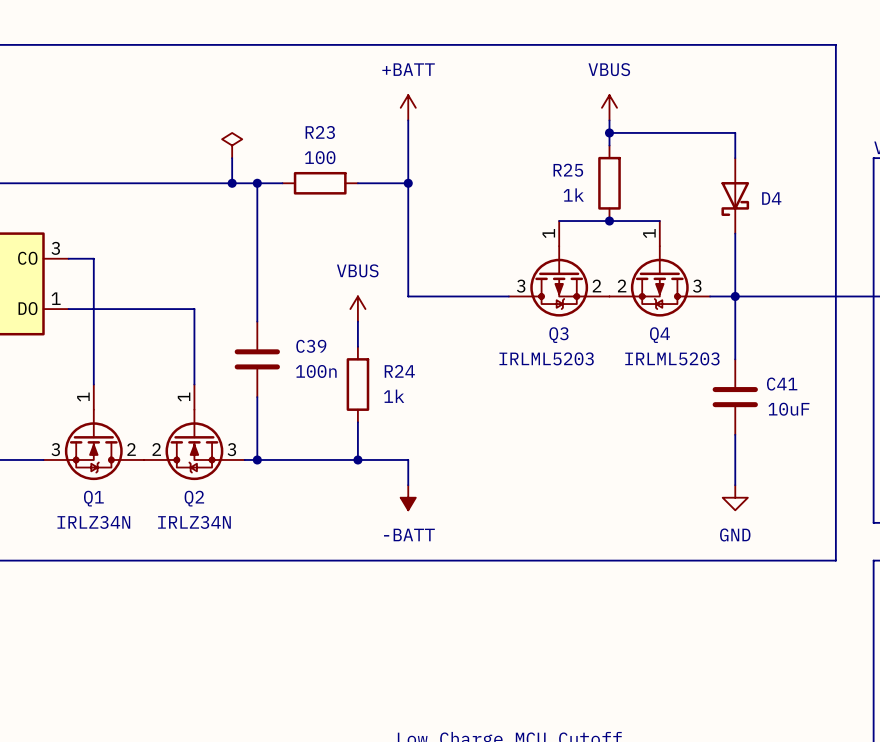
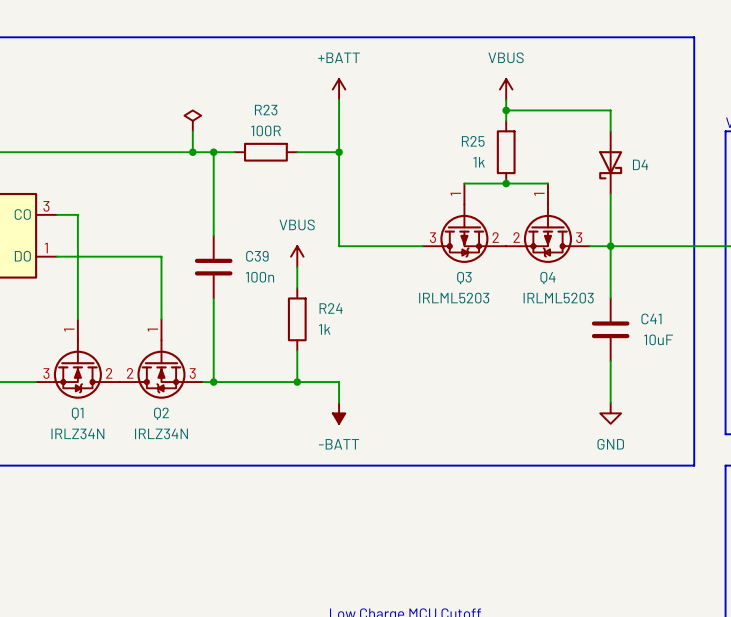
R23 value: 100 (320, 157) -> 100R (266, 130)
C39 position: (257, 359) -> (213, 267)

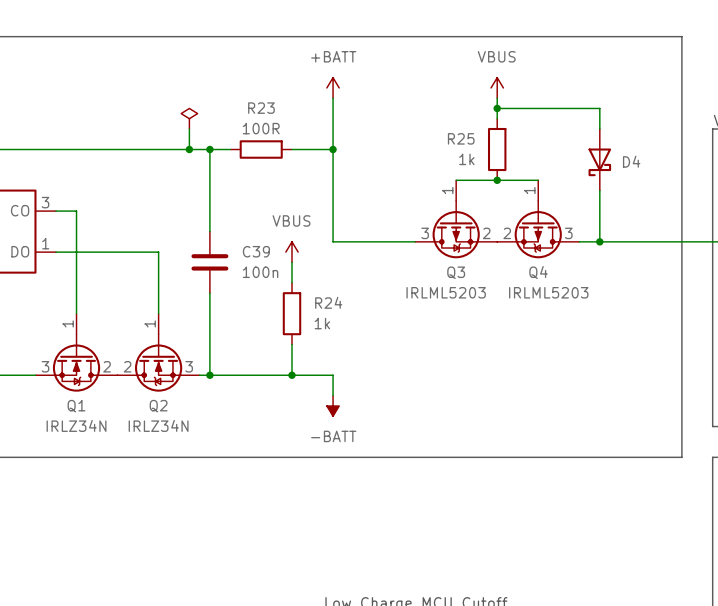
wire: (610, 246) (610, 298) -> none
C41: 10uF (610, 329) -> none
wire: (610, 361) (610, 402) -> none
power symbol: GND (610, 413) -> none

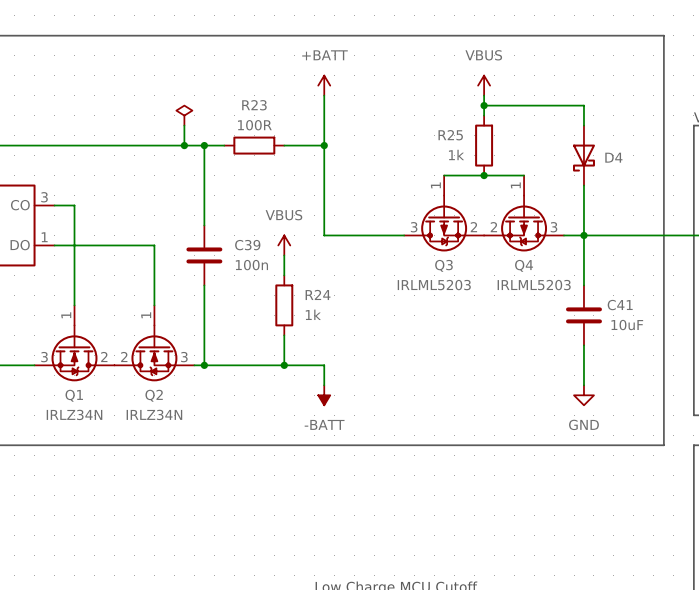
wire: none -> (583, 235) (583, 285)
C41: none -> 10uF (583, 315)
wire: none -> (583, 345) (583, 385)
power symbol: none -> GND (583, 395)

